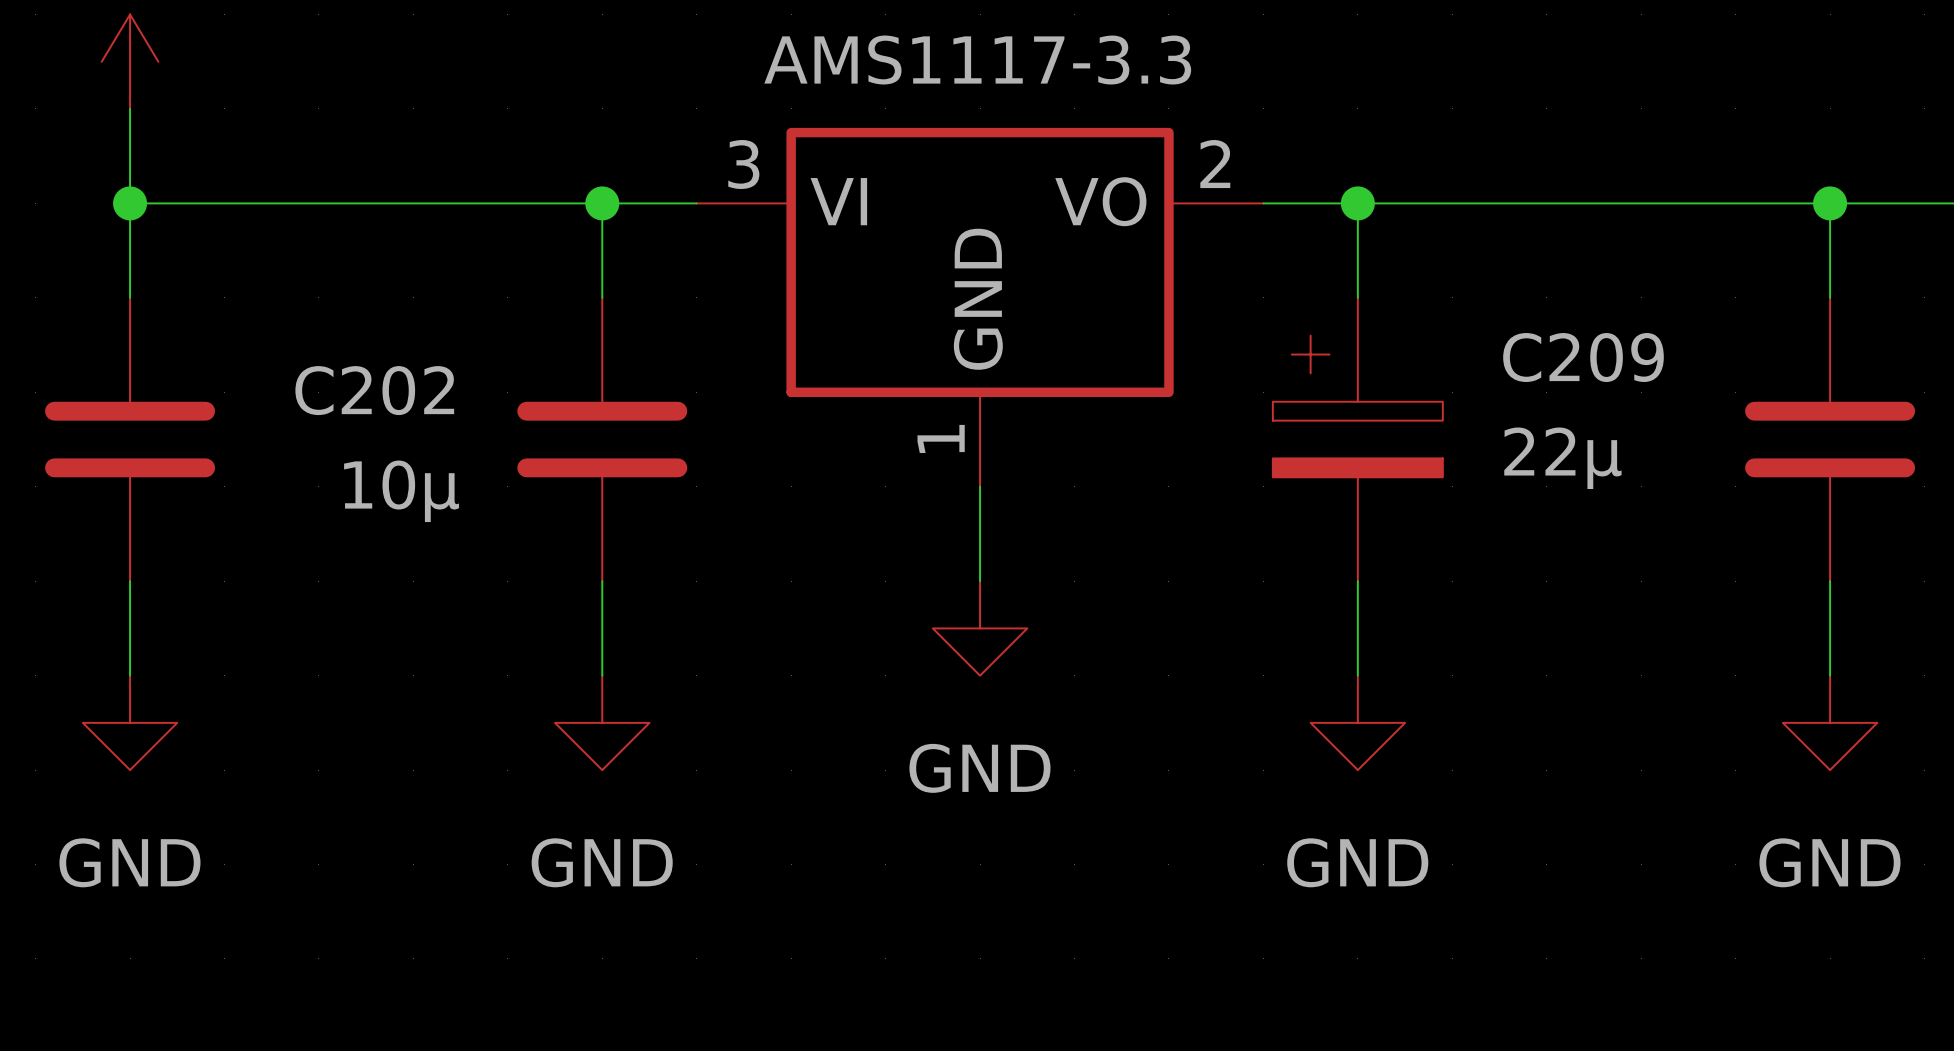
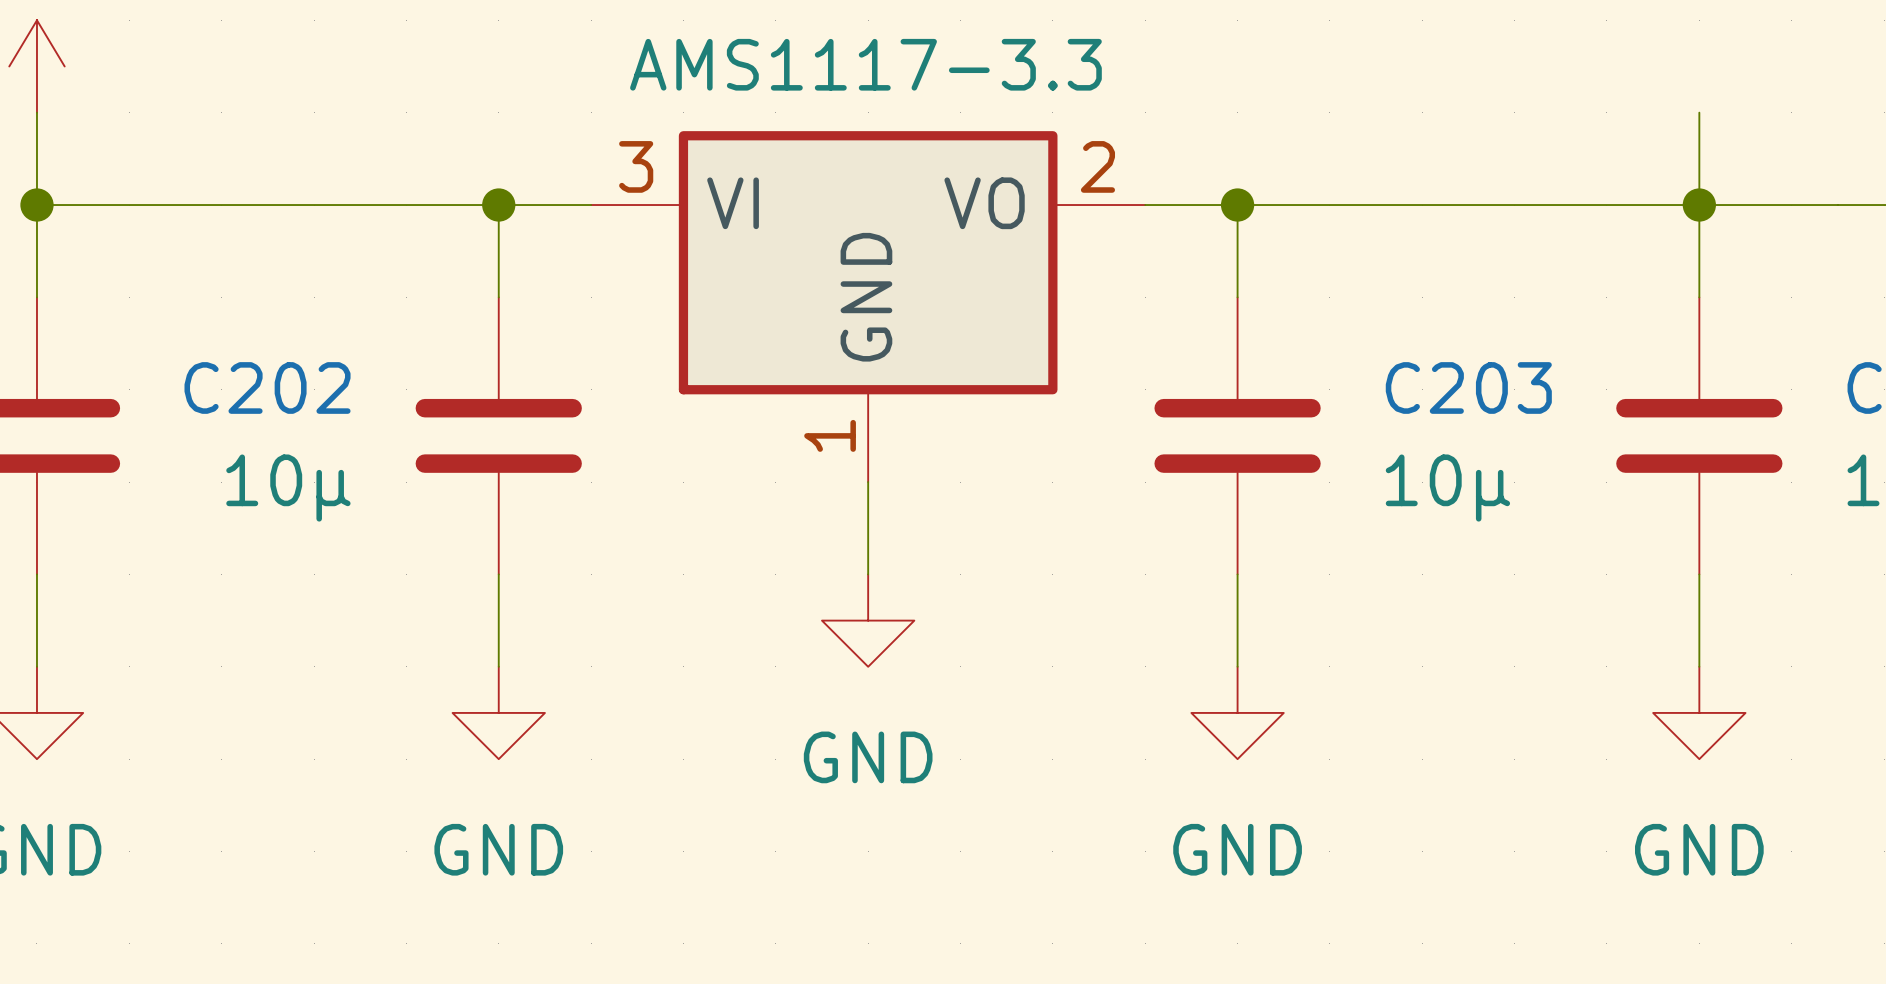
wire: none -> (1699, 112) (1699, 205)
C209: 22µ (1357, 439) -> none
C203: none -> 10µ (1237, 435)

